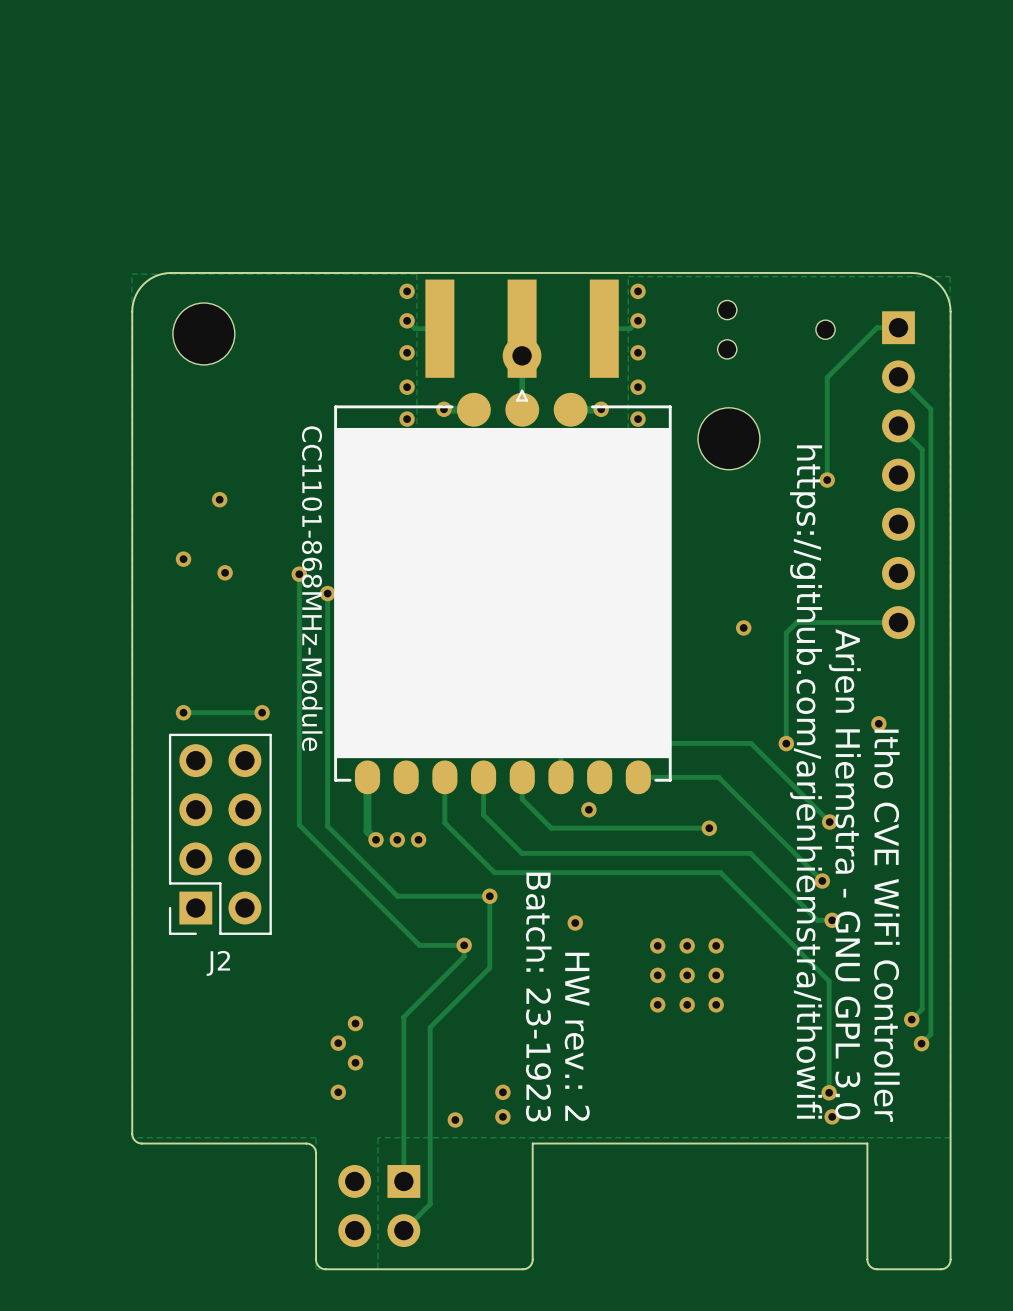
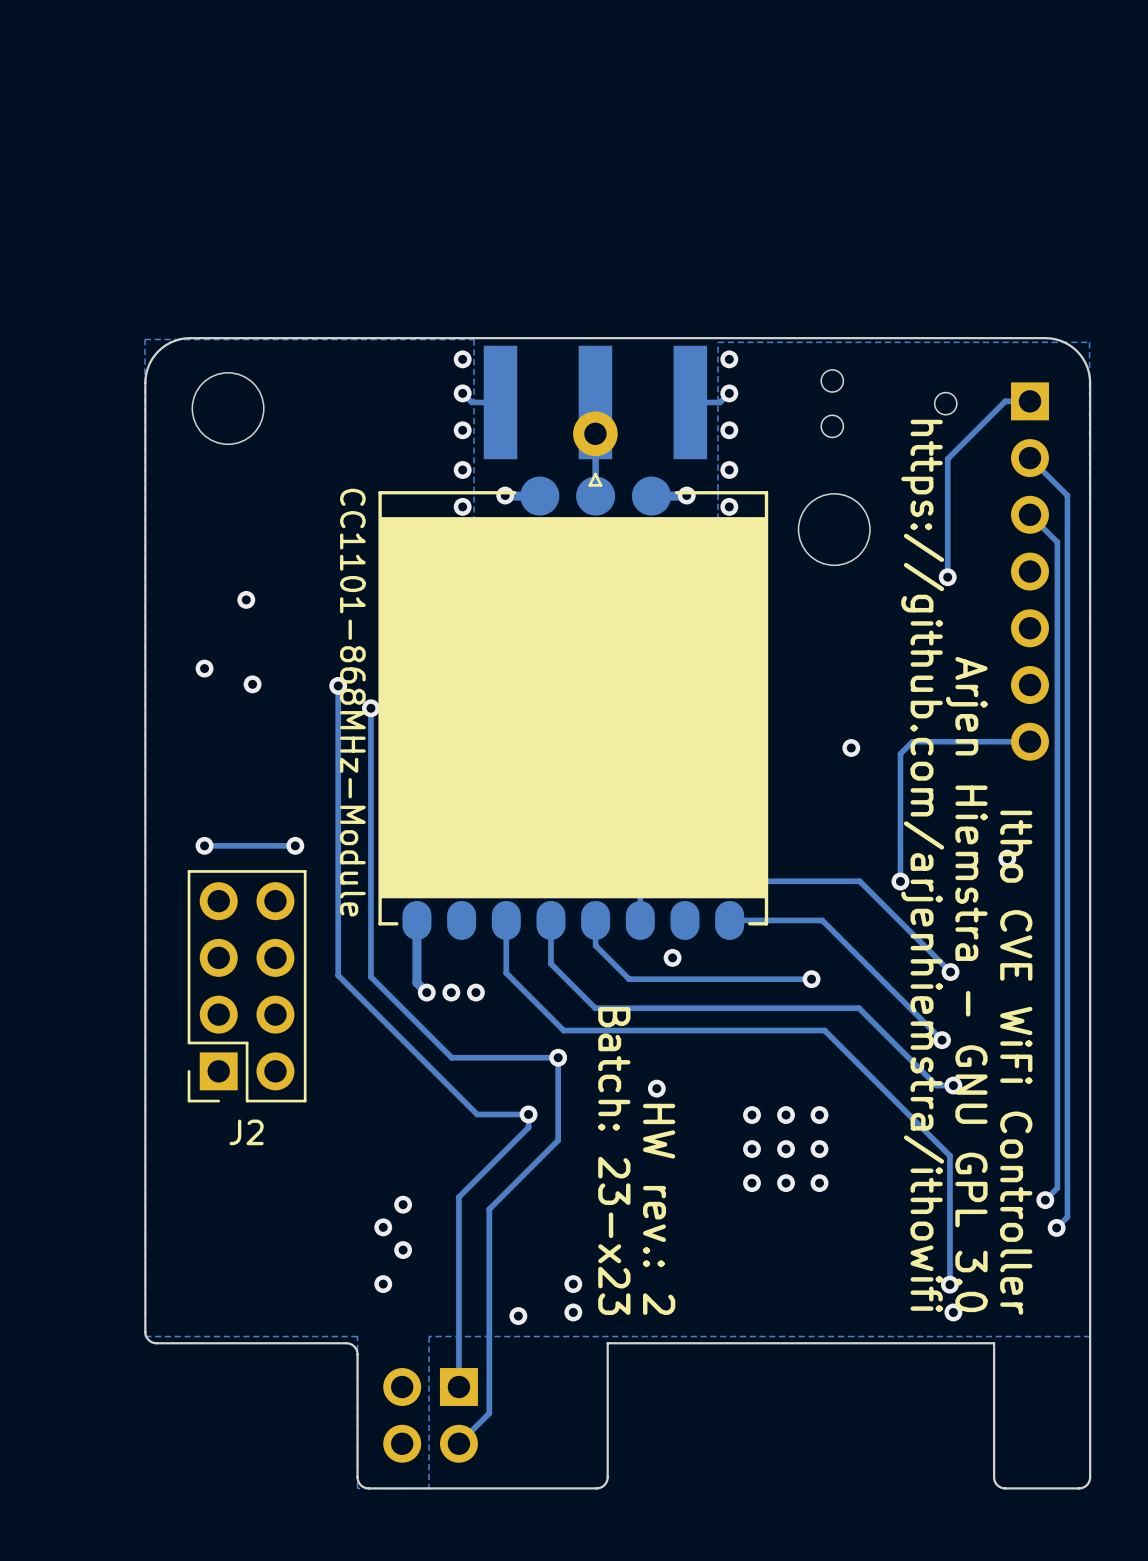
text: Batch: 23-1923 (538, 997) -> Batch: 23-x23 (614, 1160)

